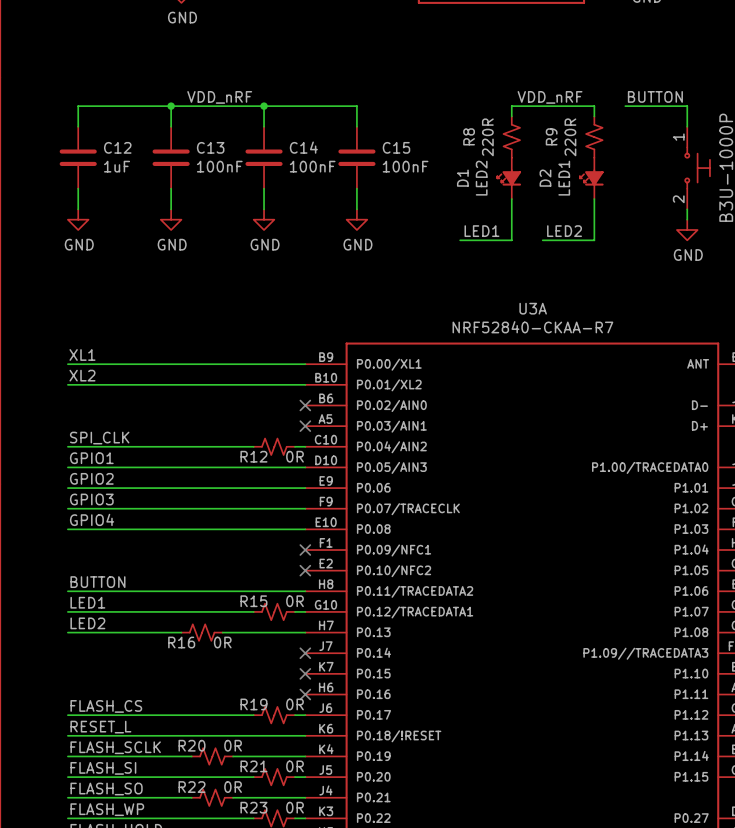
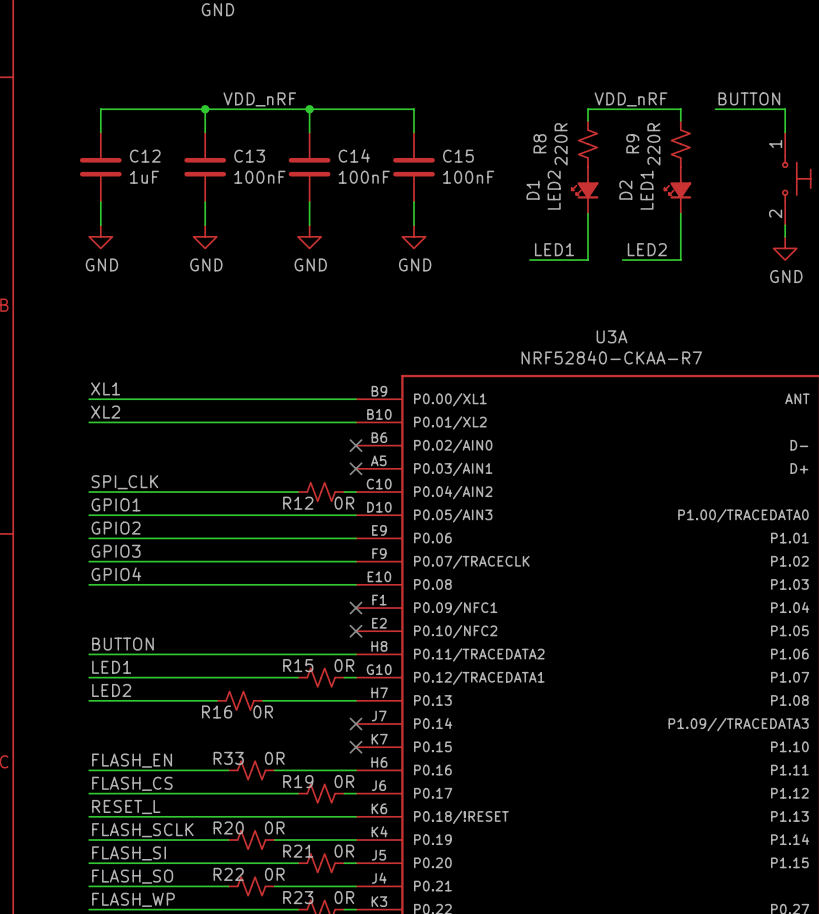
label: none -> FLASH_EN (132, 760)
wire: none -> (89, 770) (228, 770)
R33: none -> 0R (251, 770)
wire: none -> (274, 770) (355, 770)
no-connect mark: (305, 694) -> none

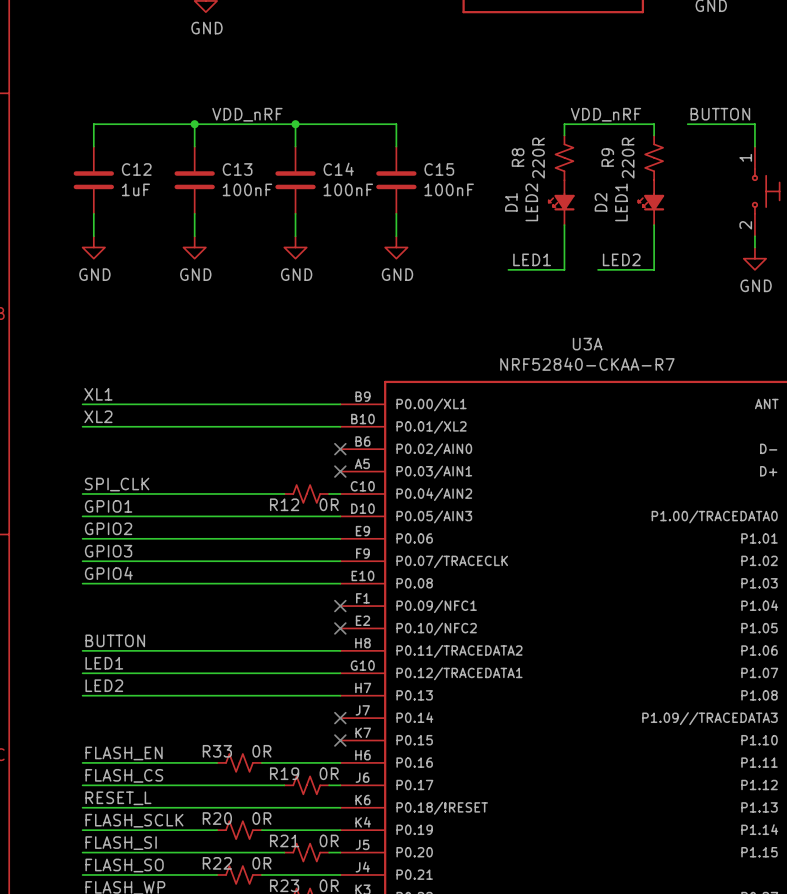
R15: 0R (321, 677) -> none
R16: 0R (240, 700) -> none

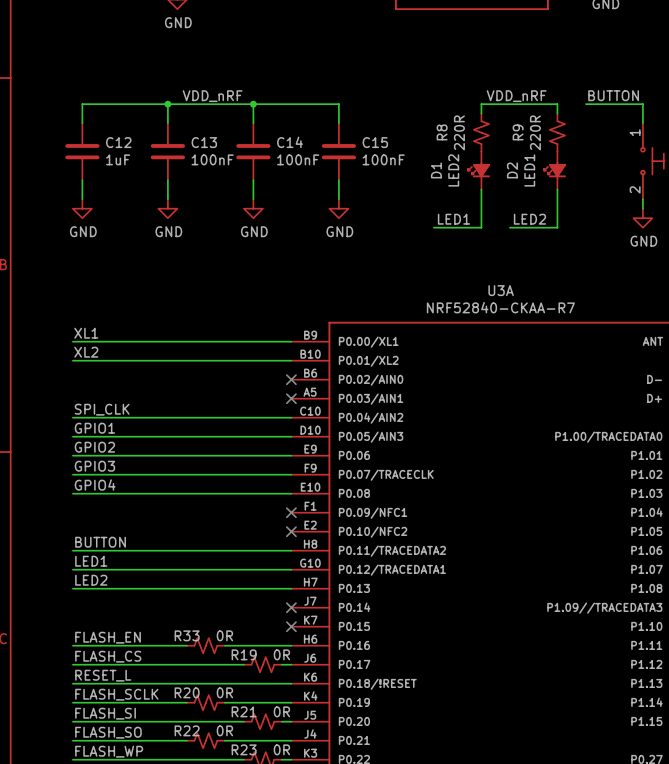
R12: 0R (306, 493) -> none

